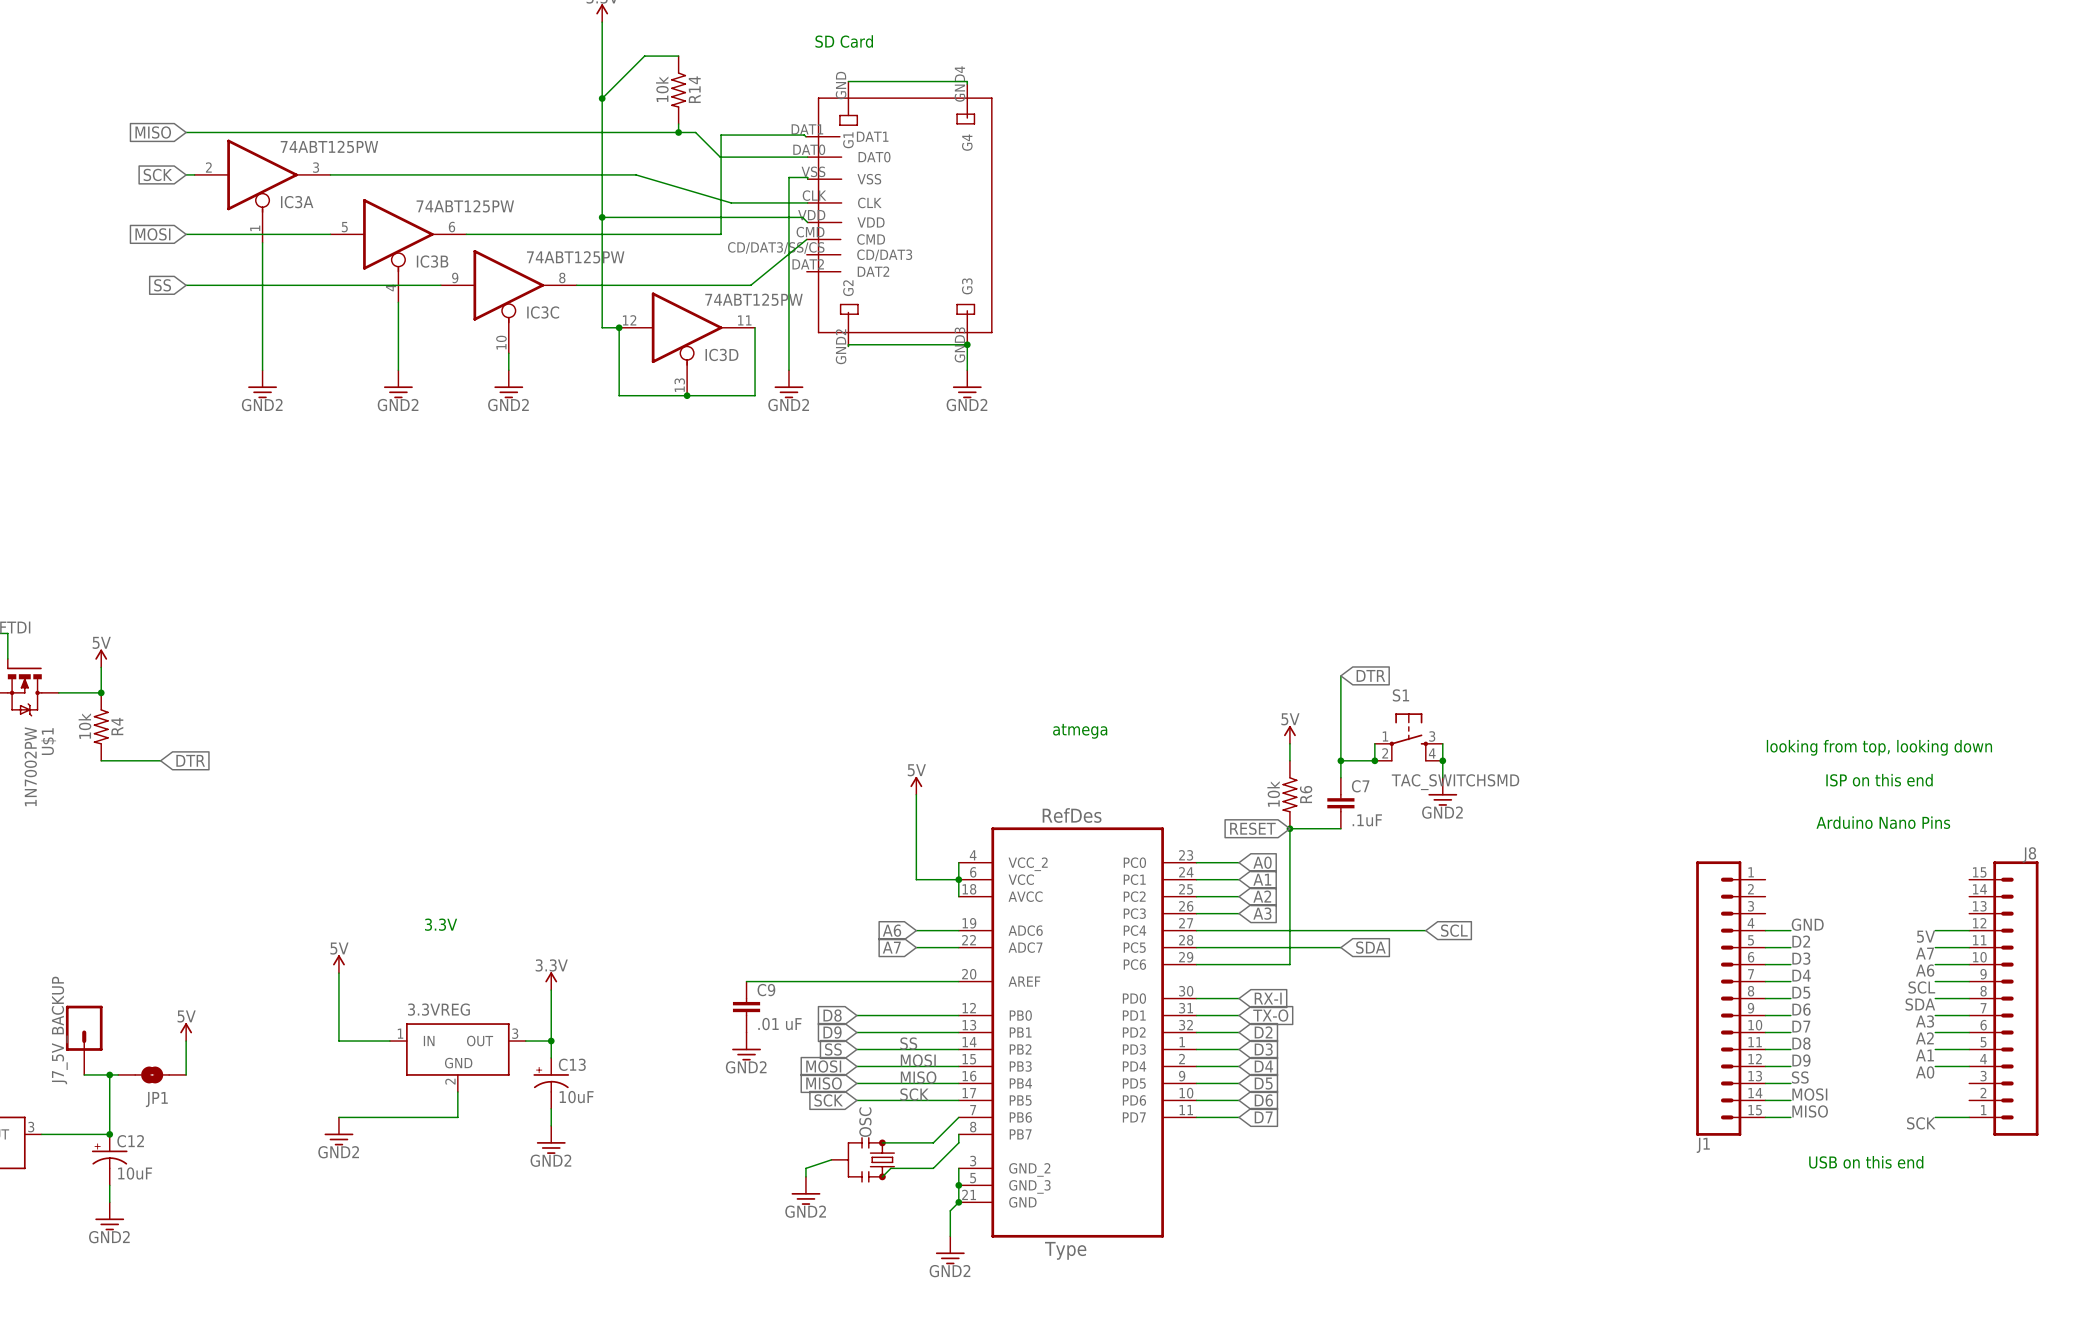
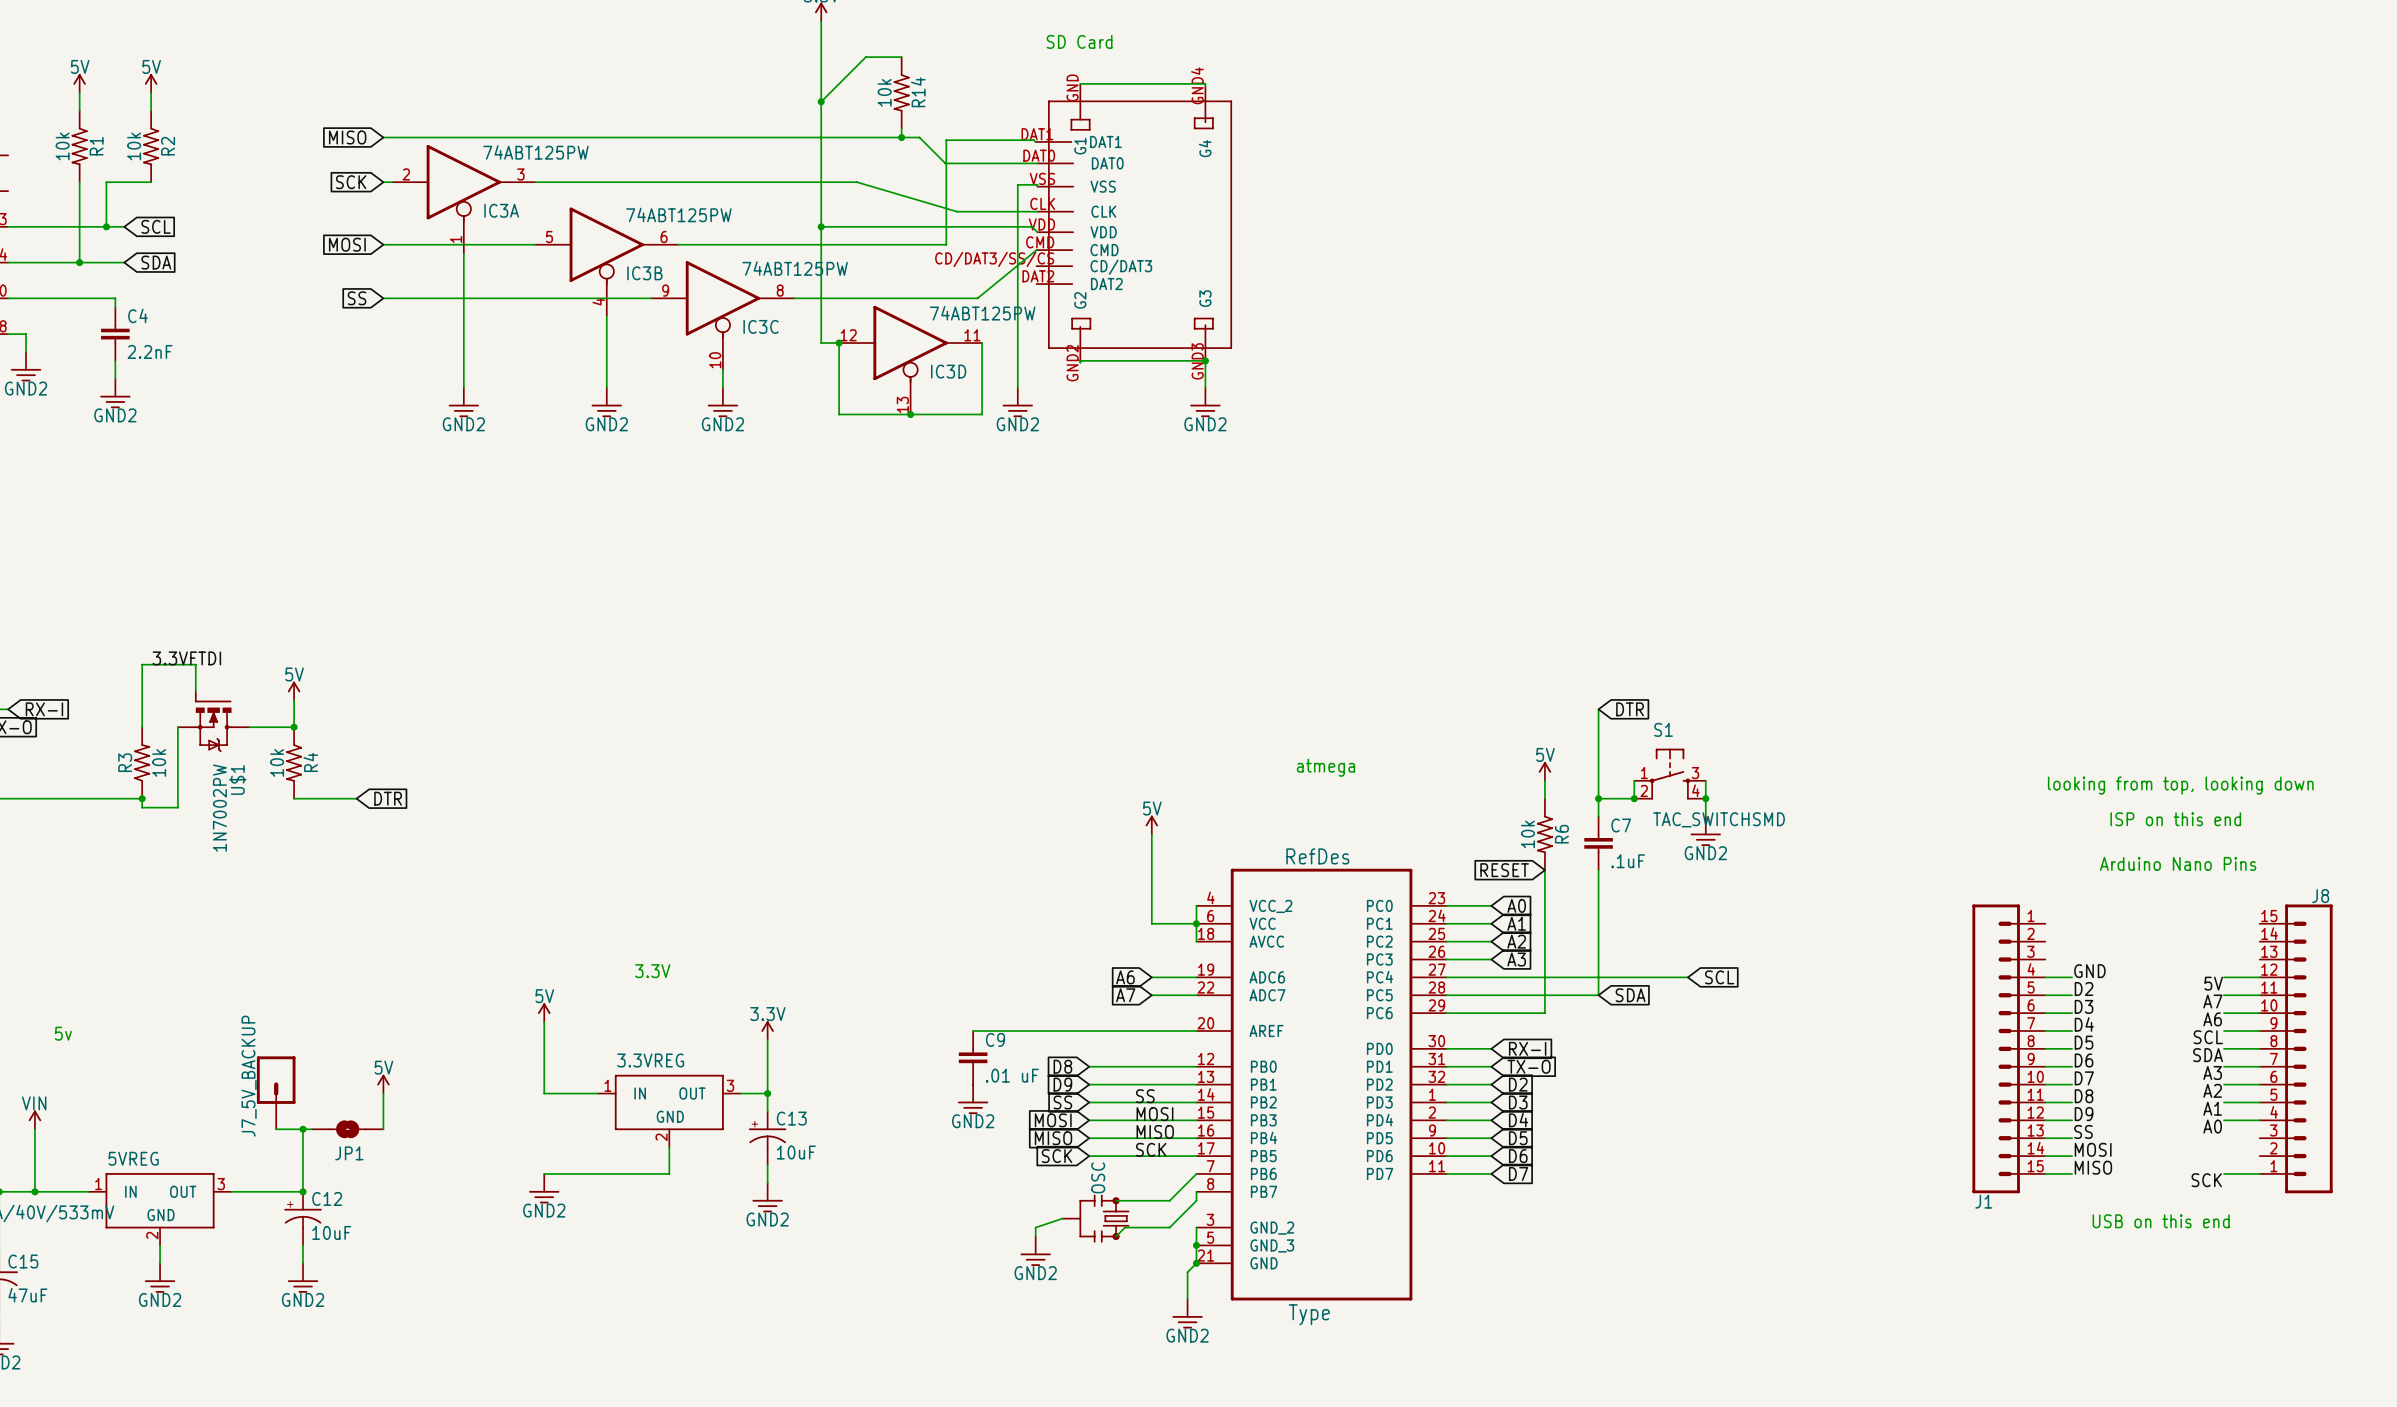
wire: (1289, 828) (1340, 828) -> (1598, 995) (1598, 870)
junction: (1289, 828) -> none

